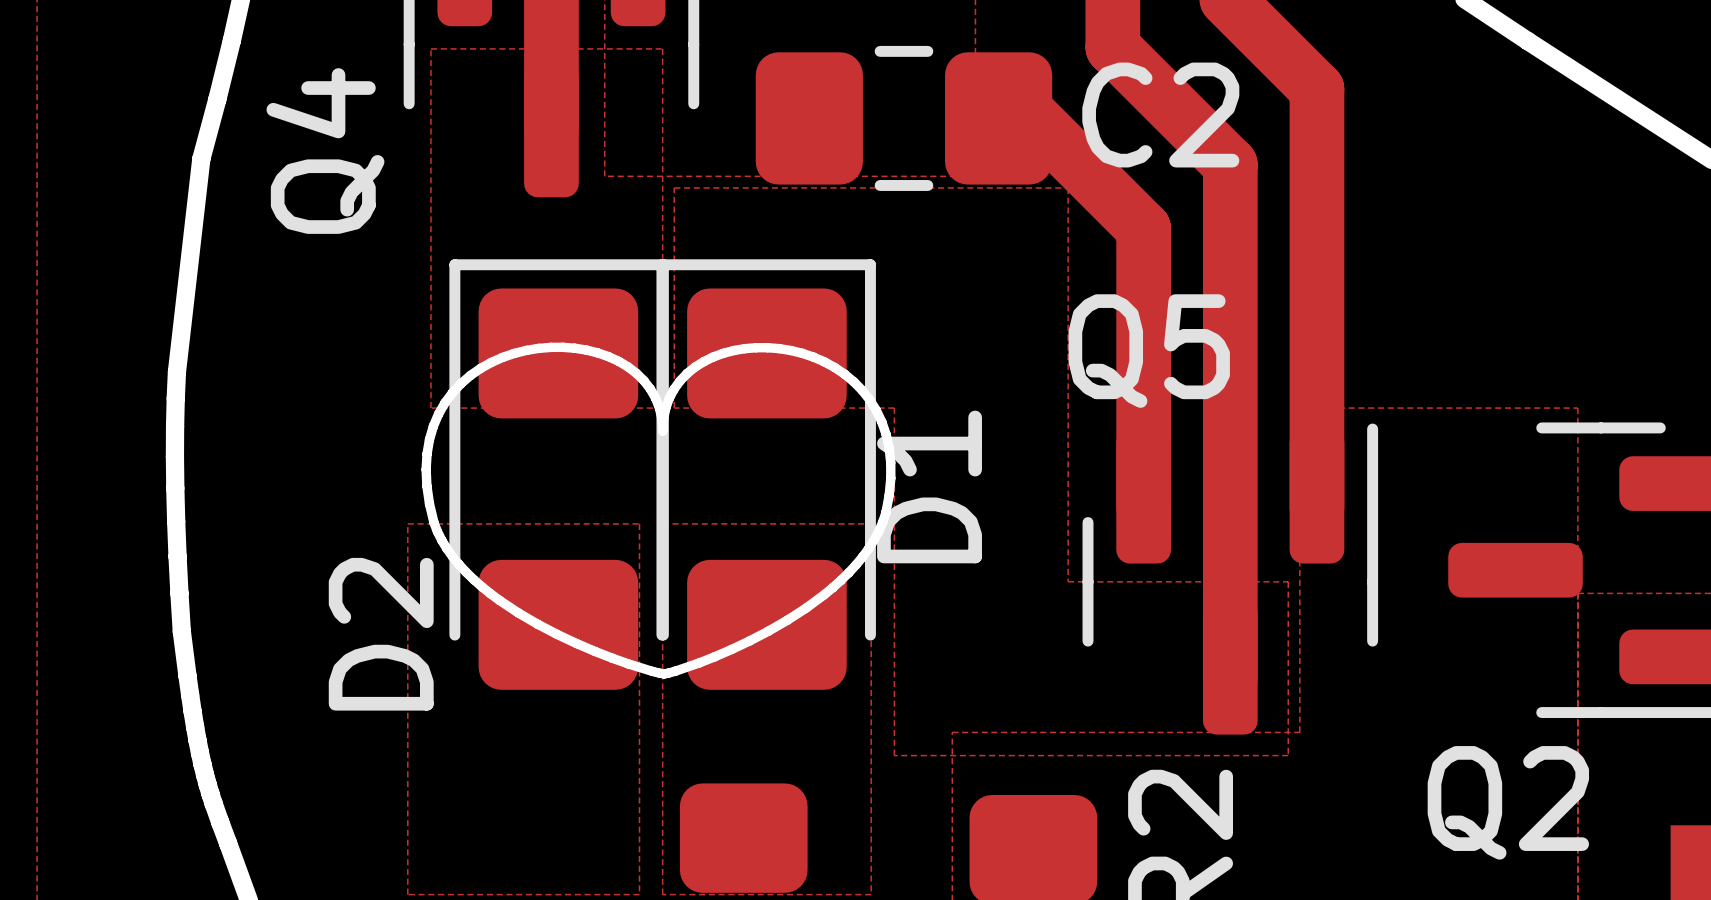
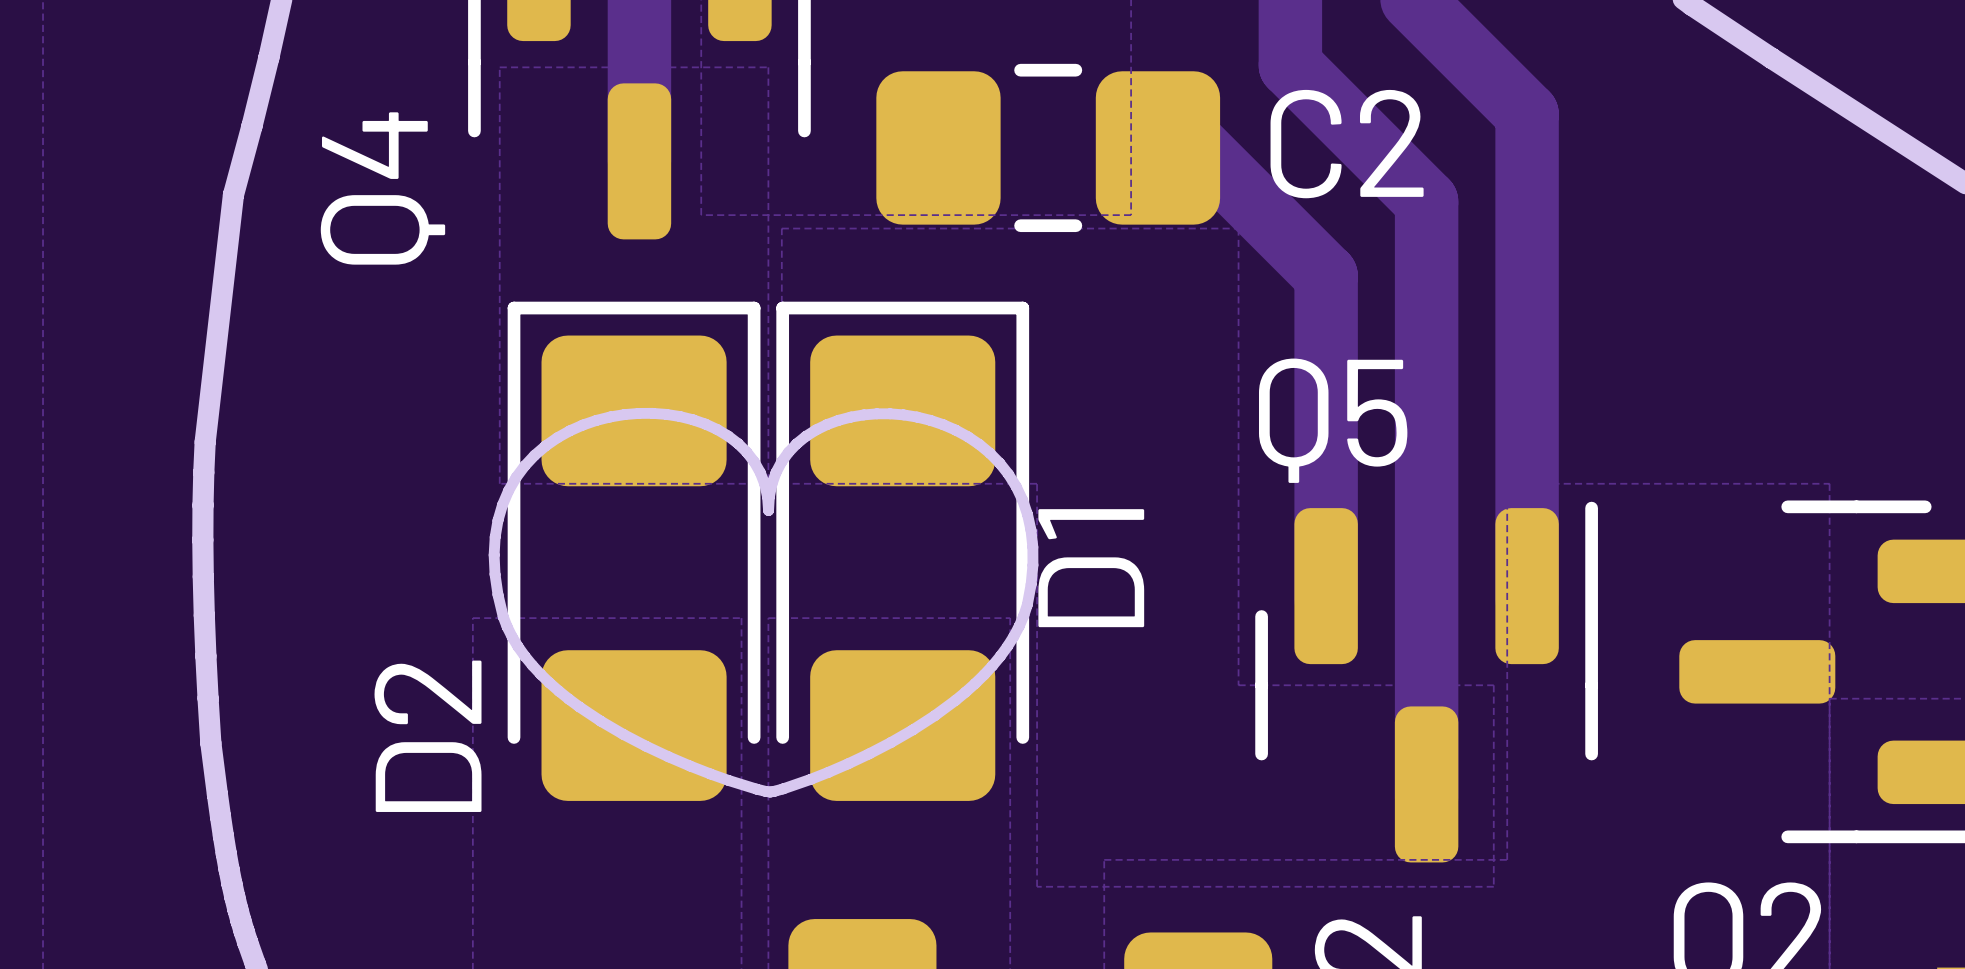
D2 position: (558, 474) -> (634, 551)
D1 position: (766, 474) -> (902, 551)

